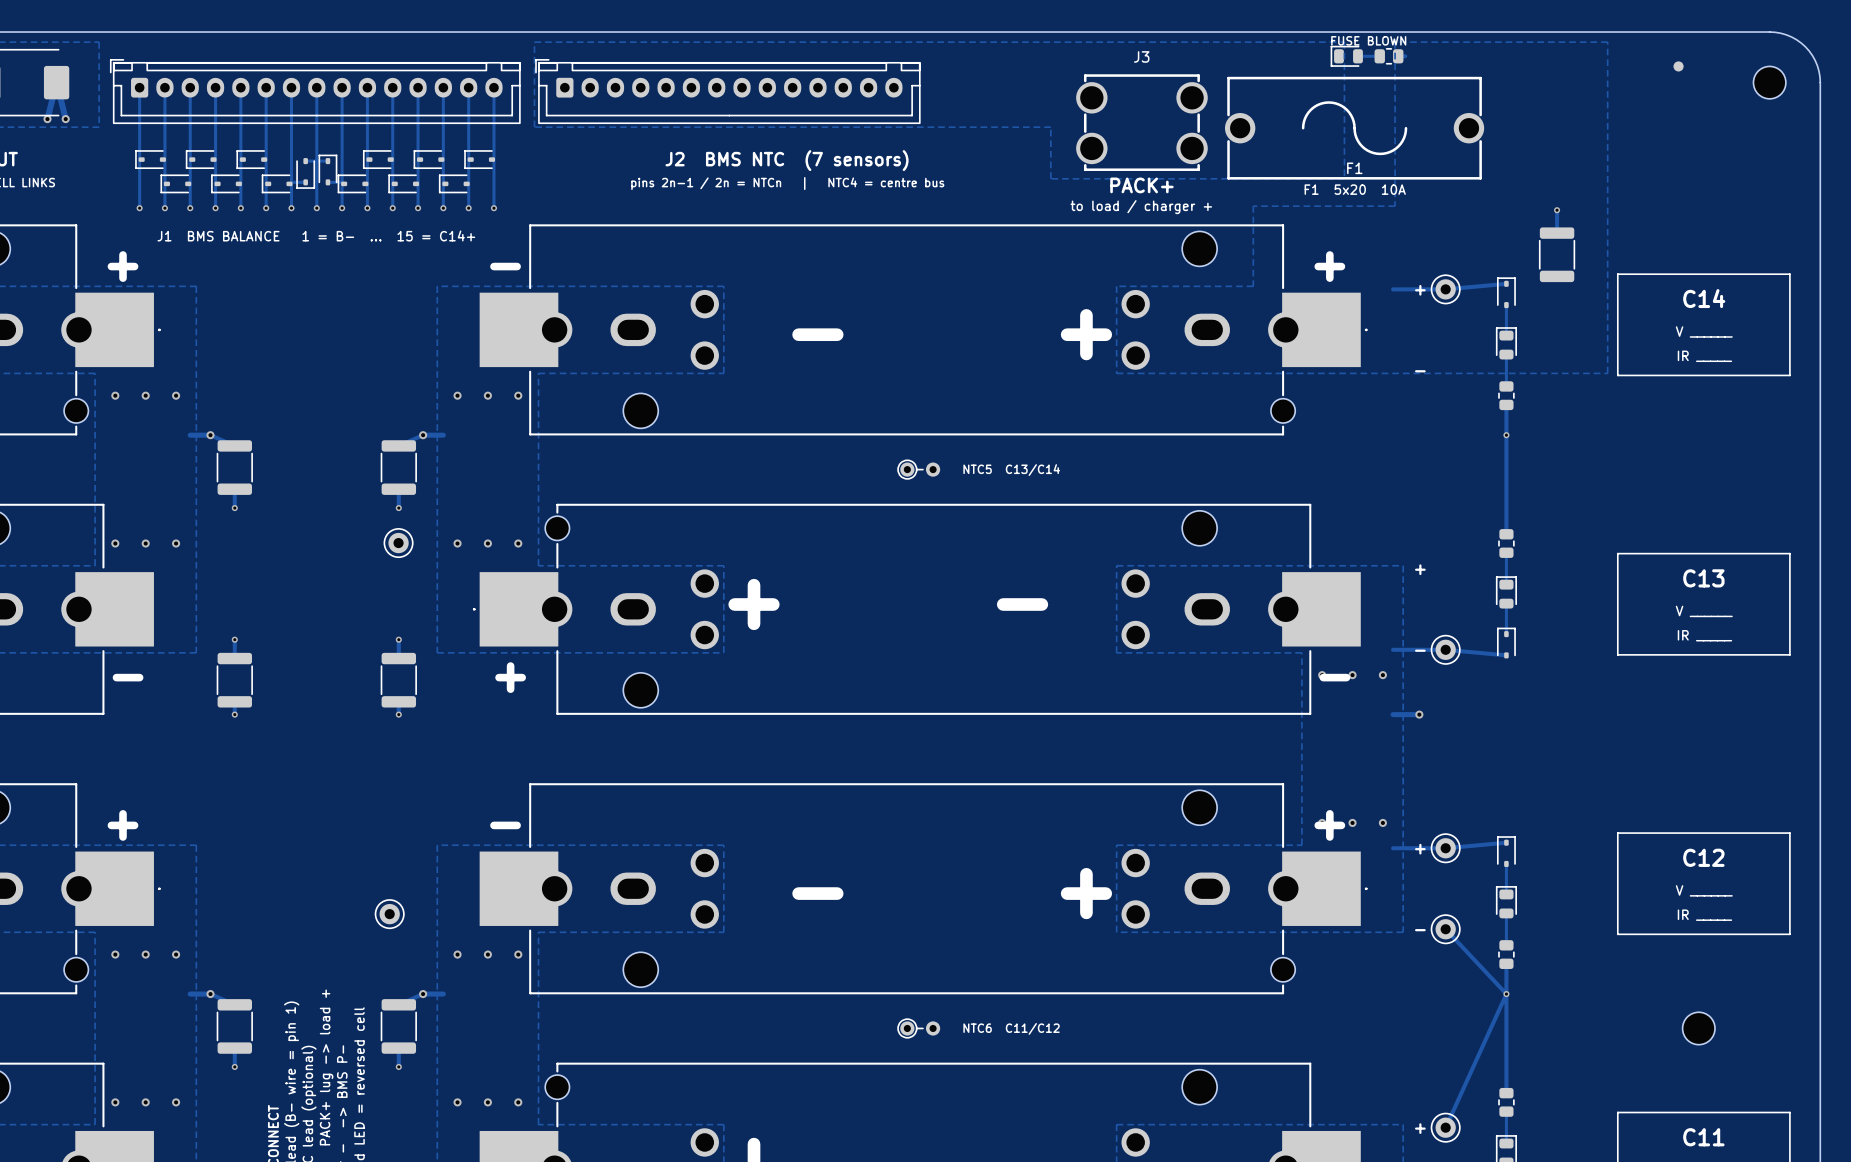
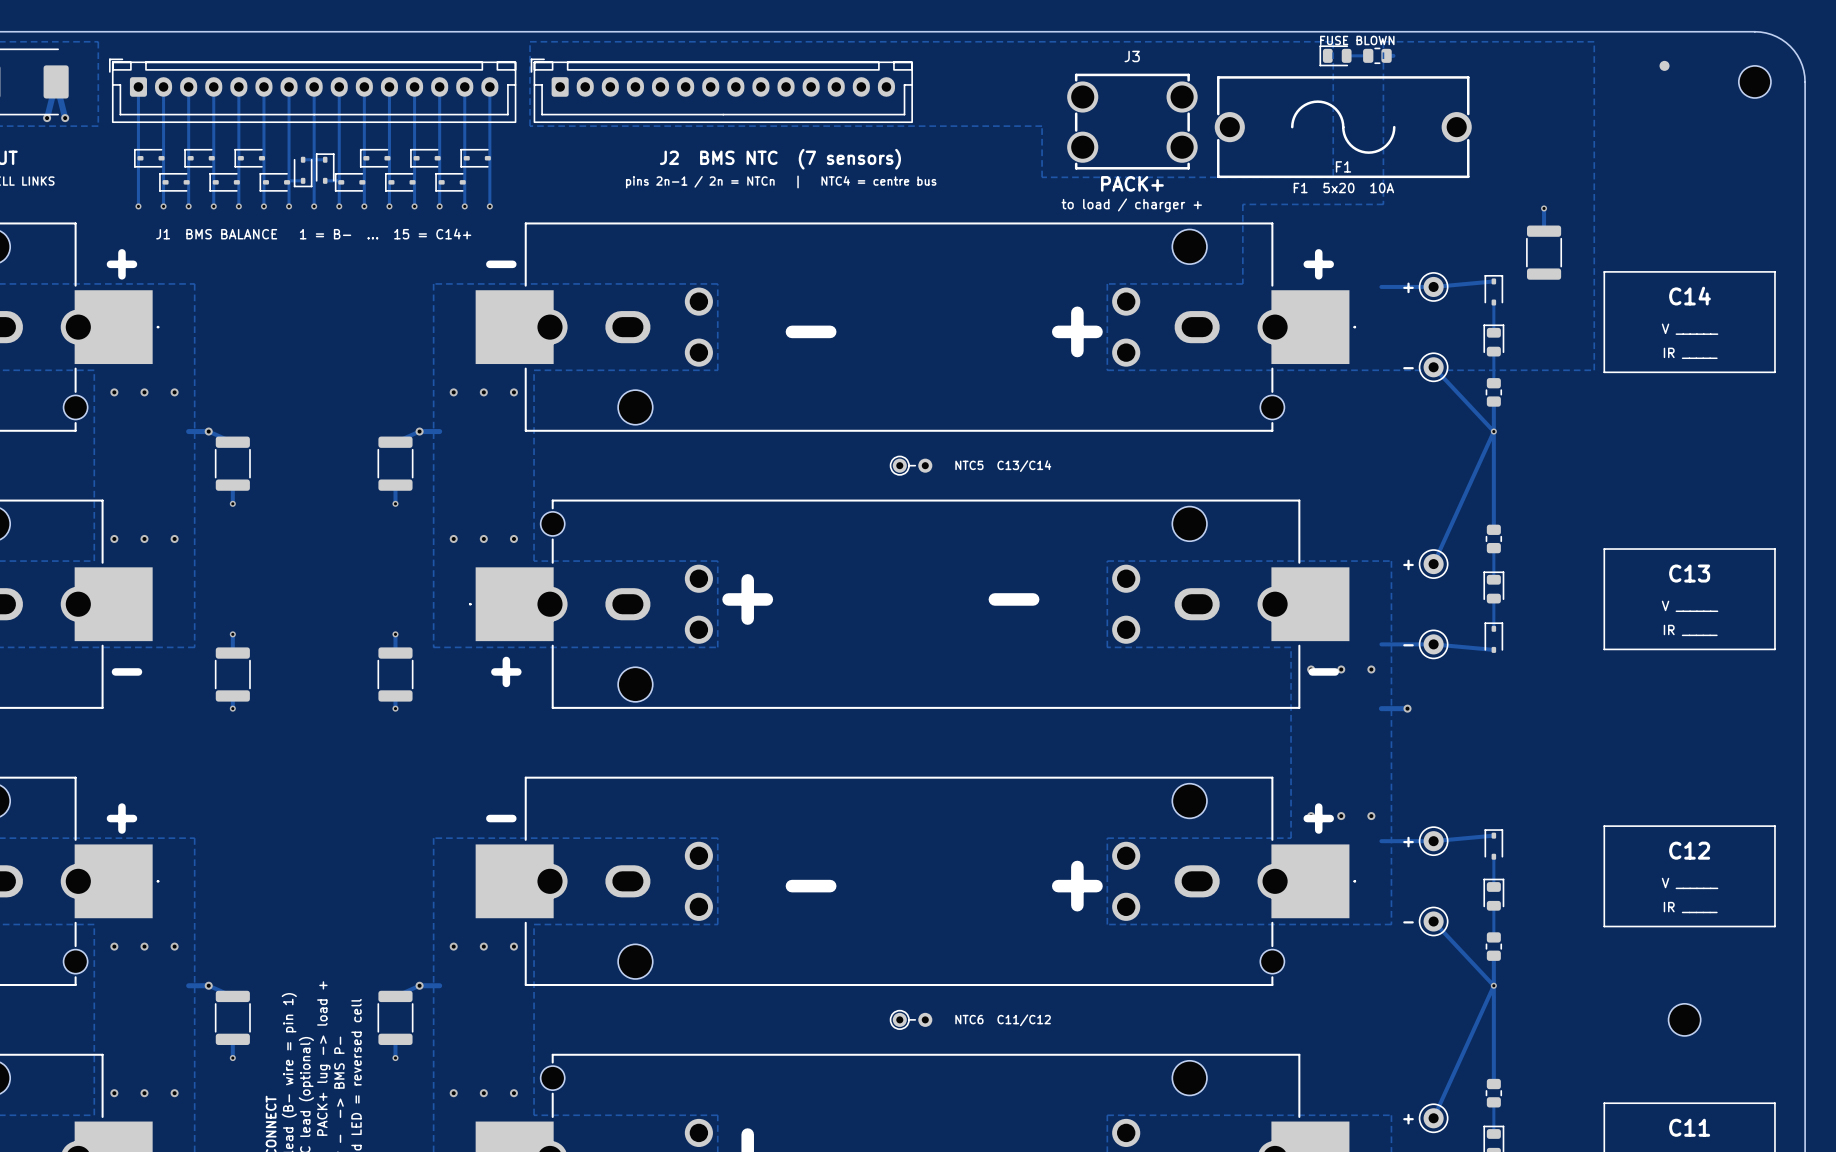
track: none -> (1433, 367) (1493, 431) (1433, 564)
part: none -> (1433, 367)
part: (398, 543) -> none
part: none -> (1433, 564)
part: (389, 914) -> none

